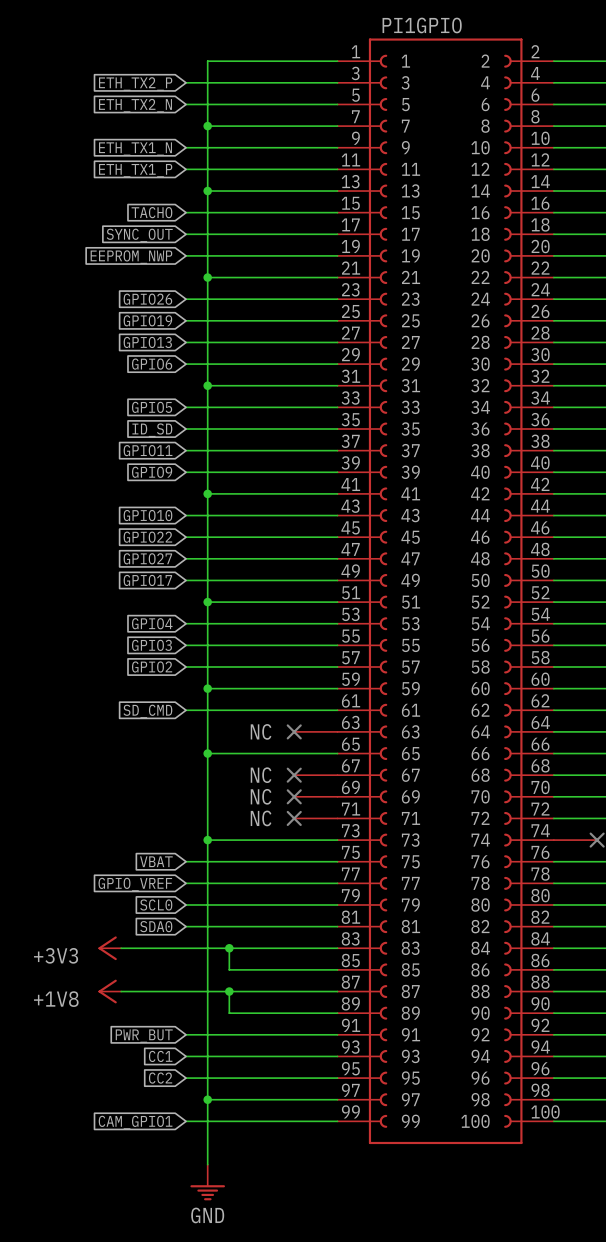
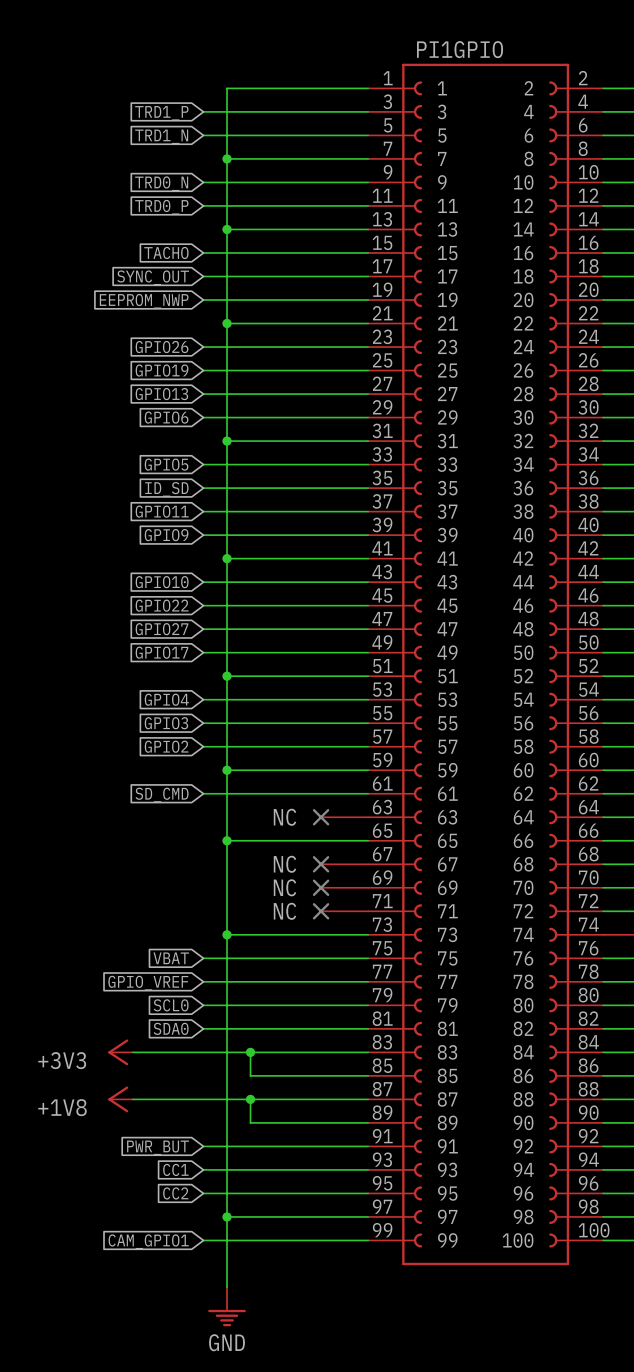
global label: ETH_TX2_P (135, 84) -> TRD1_P (161, 113)
global label: ETH_TX2_N (135, 105) -> TRD1_N (161, 136)
global label: ETH_TX1_N (135, 149) -> TRD0_N (161, 183)
global label: ETH_TX1_P (135, 170) -> TRD0_P (161, 207)

